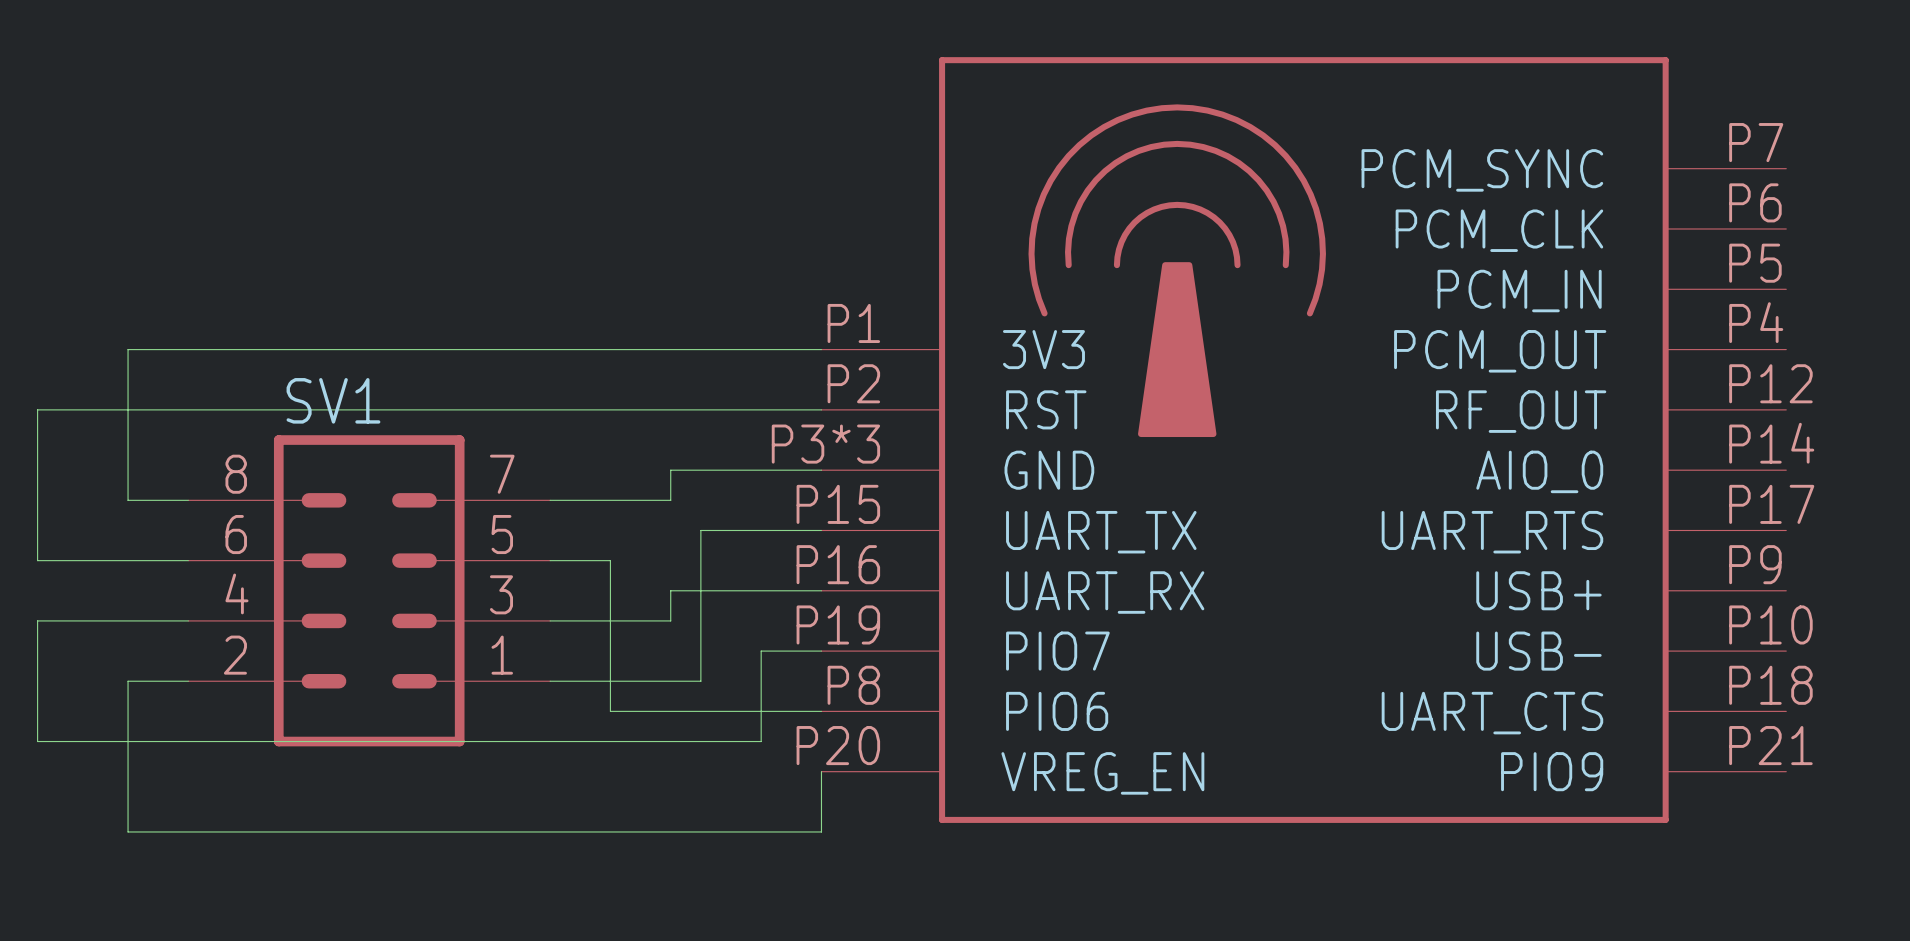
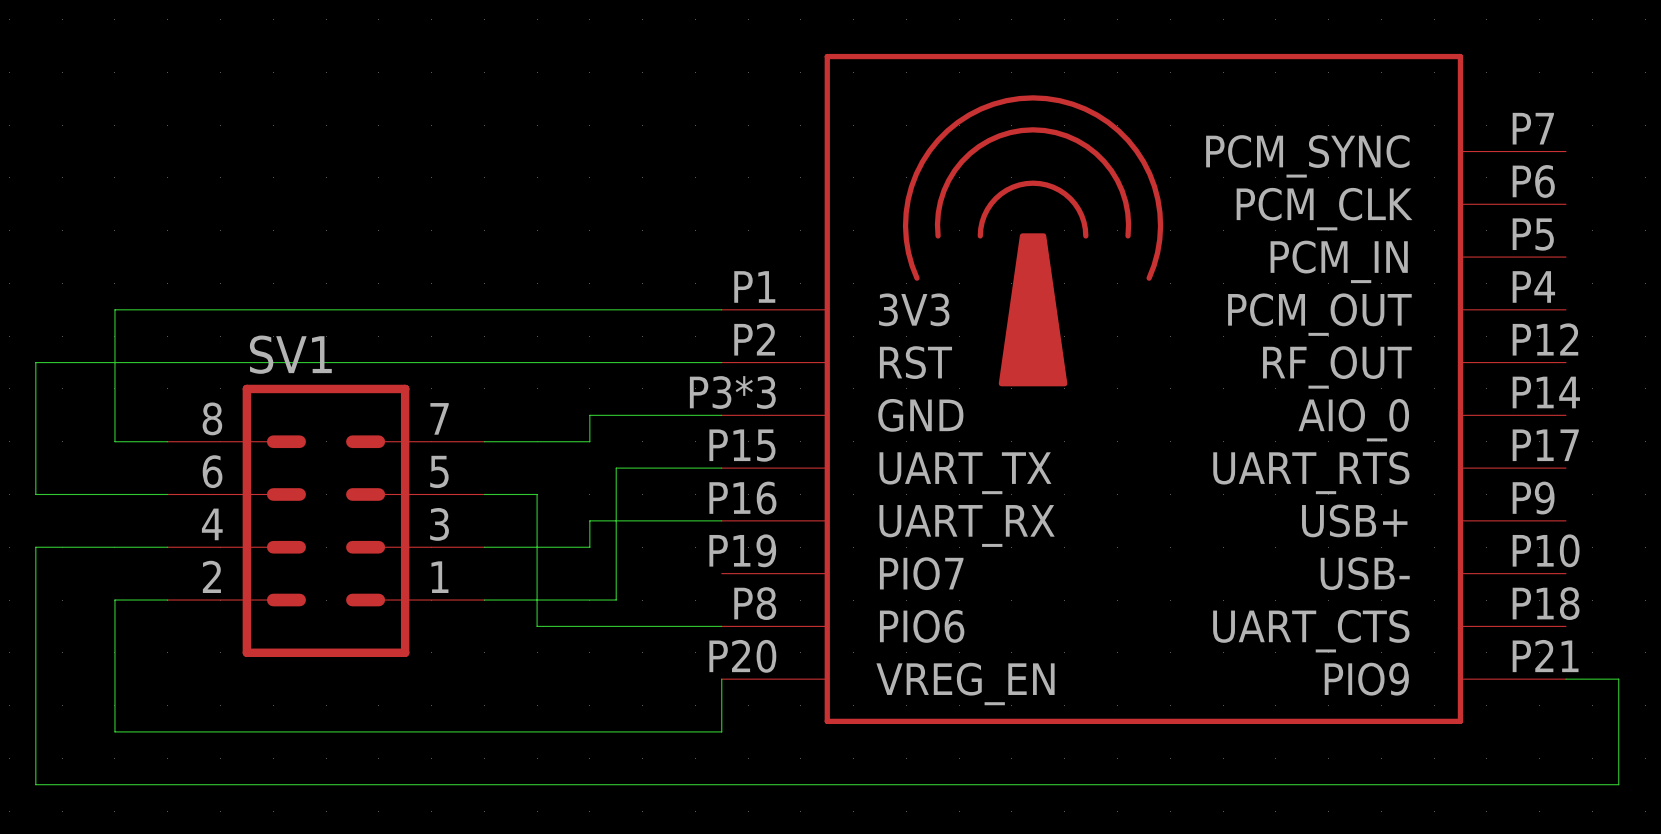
wire: (821, 651) (761, 651) (761, 741) (37, 741) -> (1565, 679) (1618, 679) (1618, 784) (35, 784) (35, 652)

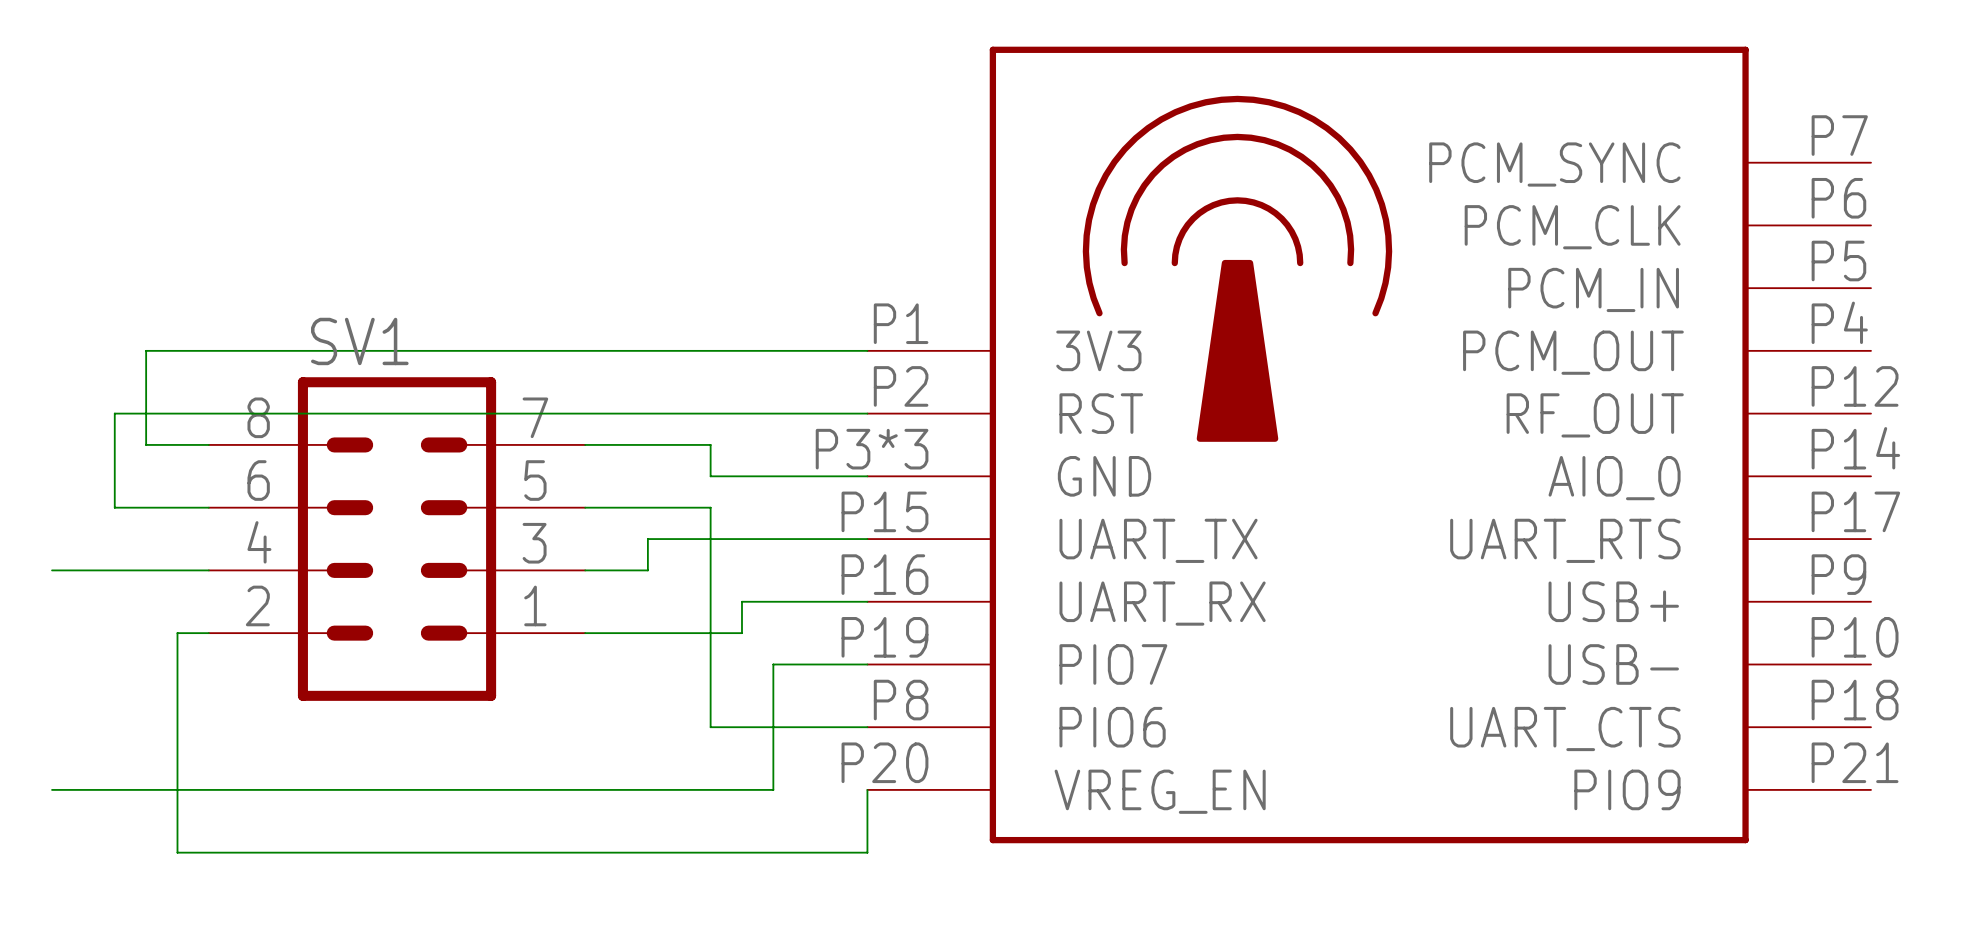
wire: (88, 362) (35, 362) (35, 494) -> none
wire: (114, 388) (114, 441) -> (114, 413) (114, 507) (146, 507)
wire: none -> (146, 444) (208, 444)
wire: (589, 415) (589, 441) -> (710, 476) (710, 444) (585, 444)
wire: (616, 468) (616, 520) (589, 520) -> (710, 507) (710, 601)
wire: none -> (741, 539) (647, 539) (647, 570)
wire: (537, 494) (537, 626) (589, 626) -> (741, 633) (710, 633) (710, 727)
SV1 position: (326, 520) -> (397, 539)
wire: (141, 547) (35, 547) (35, 784) (1618, 784) (1618, 679) (1565, 679) -> none
wire: (616, 547) (616, 600) (484, 600) -> none
wire: none -> (867, 664) (773, 664) (773, 789) (52, 789)
wire: (167, 600) (114, 600) (114, 731) (141, 731) -> (177, 633) (177, 852)

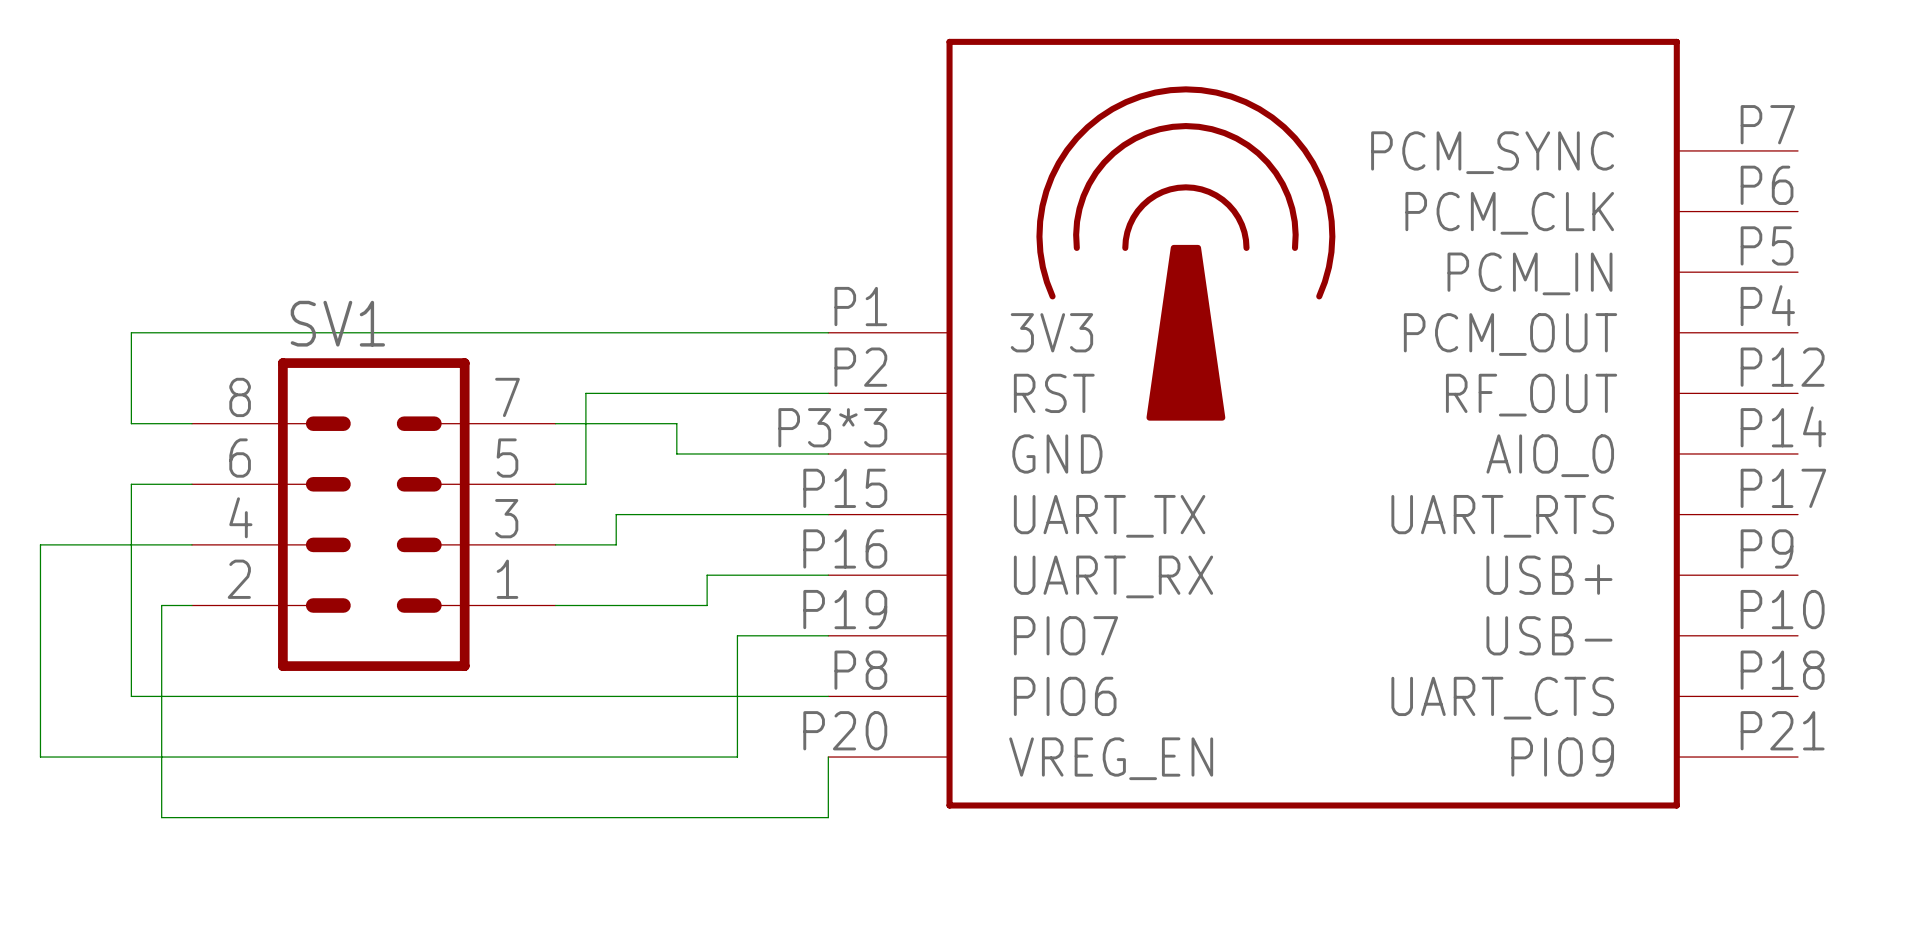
wire: (616, 413) (114, 413) (114, 507) (146, 507) -> (676, 696) (131, 696) (131, 484)
wire: (616, 507) (710, 507) (710, 727) -> (585, 484) (585, 393)
wire: none -> (40, 544) (40, 757)

